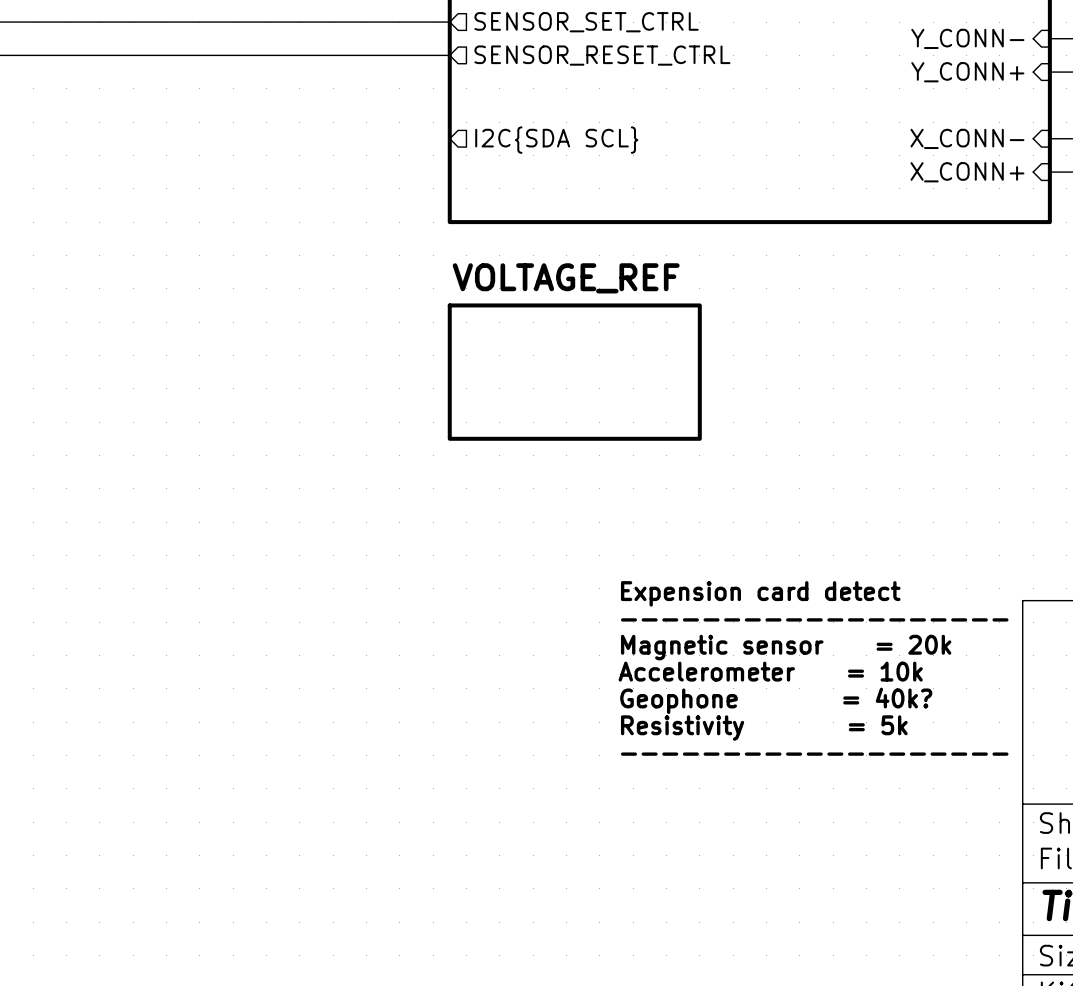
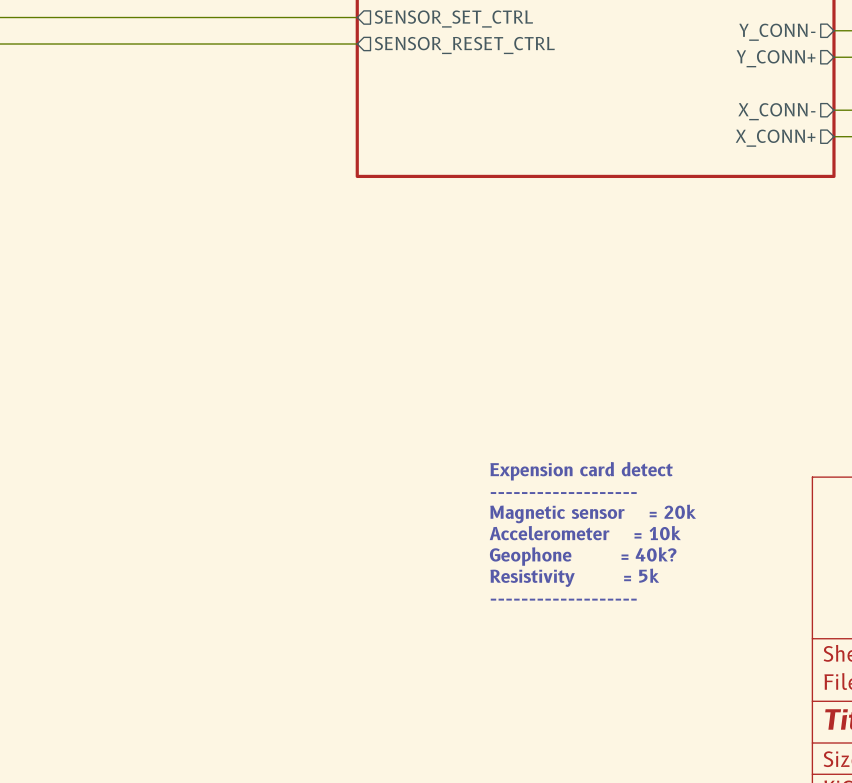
sheet pin shape: input (967, 38) -> output (777, 32)
sheet pin shape: input (967, 72) -> output (776, 58)
sheet pin shape: input (967, 138) -> output (776, 111)
sheet pin: I2C{SDA SCL} (556, 140) -> none
sheet pin shape: input (967, 172) -> output (775, 138)
sheet VOLTAGE_REF: (574, 372) -> none

